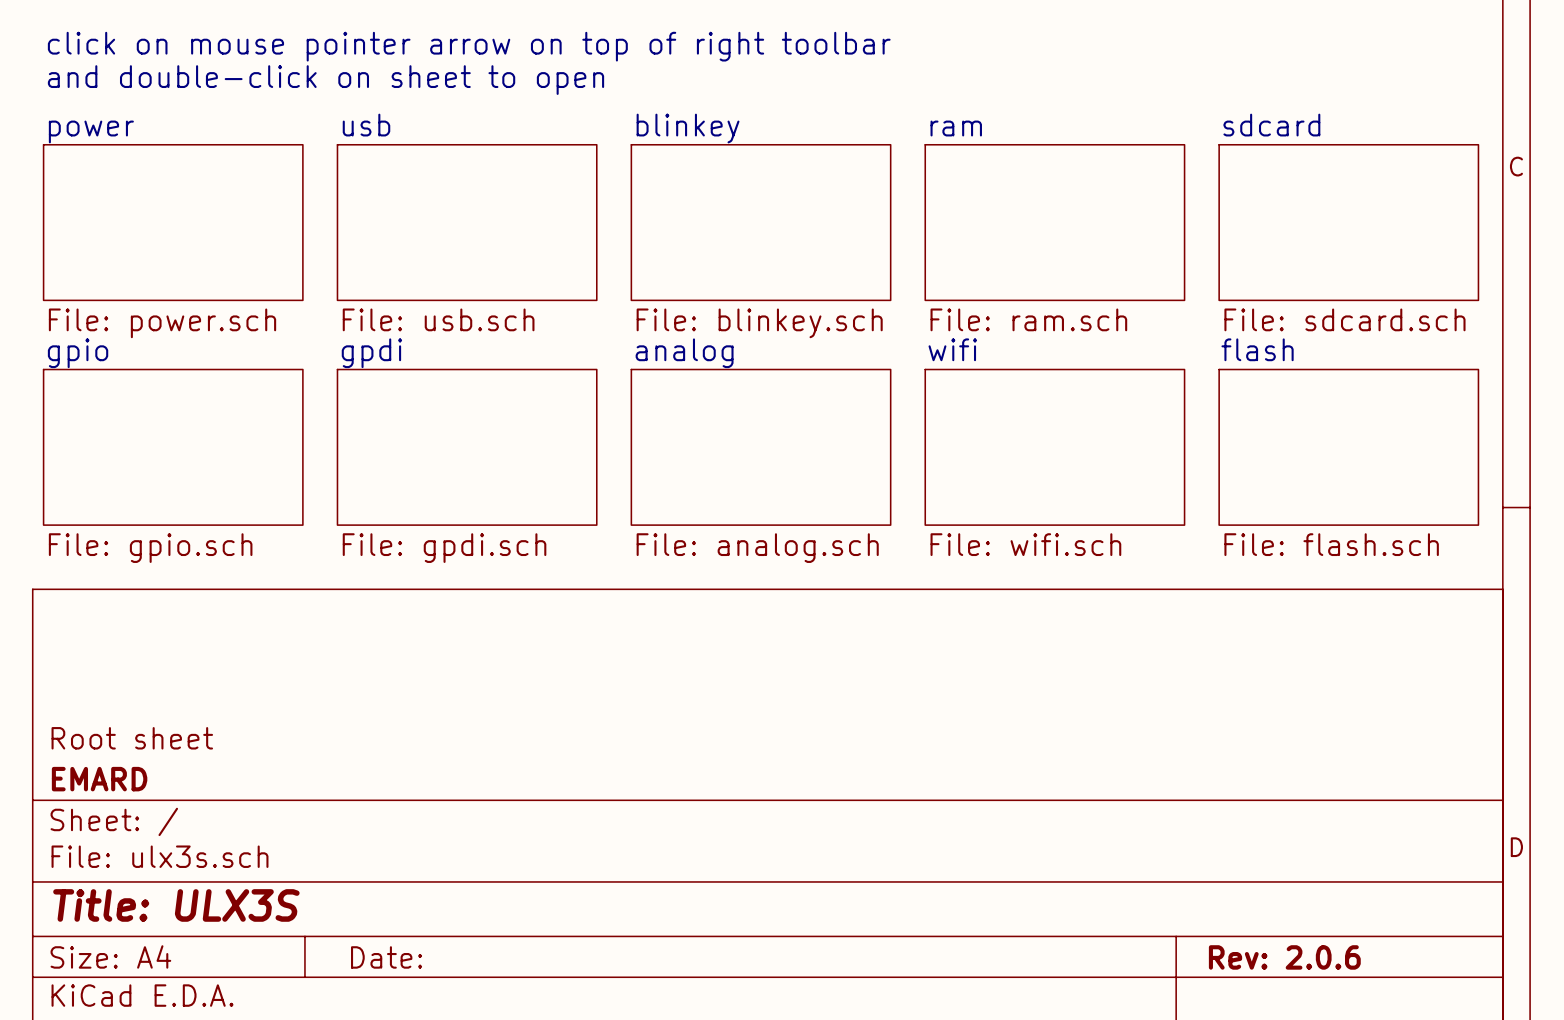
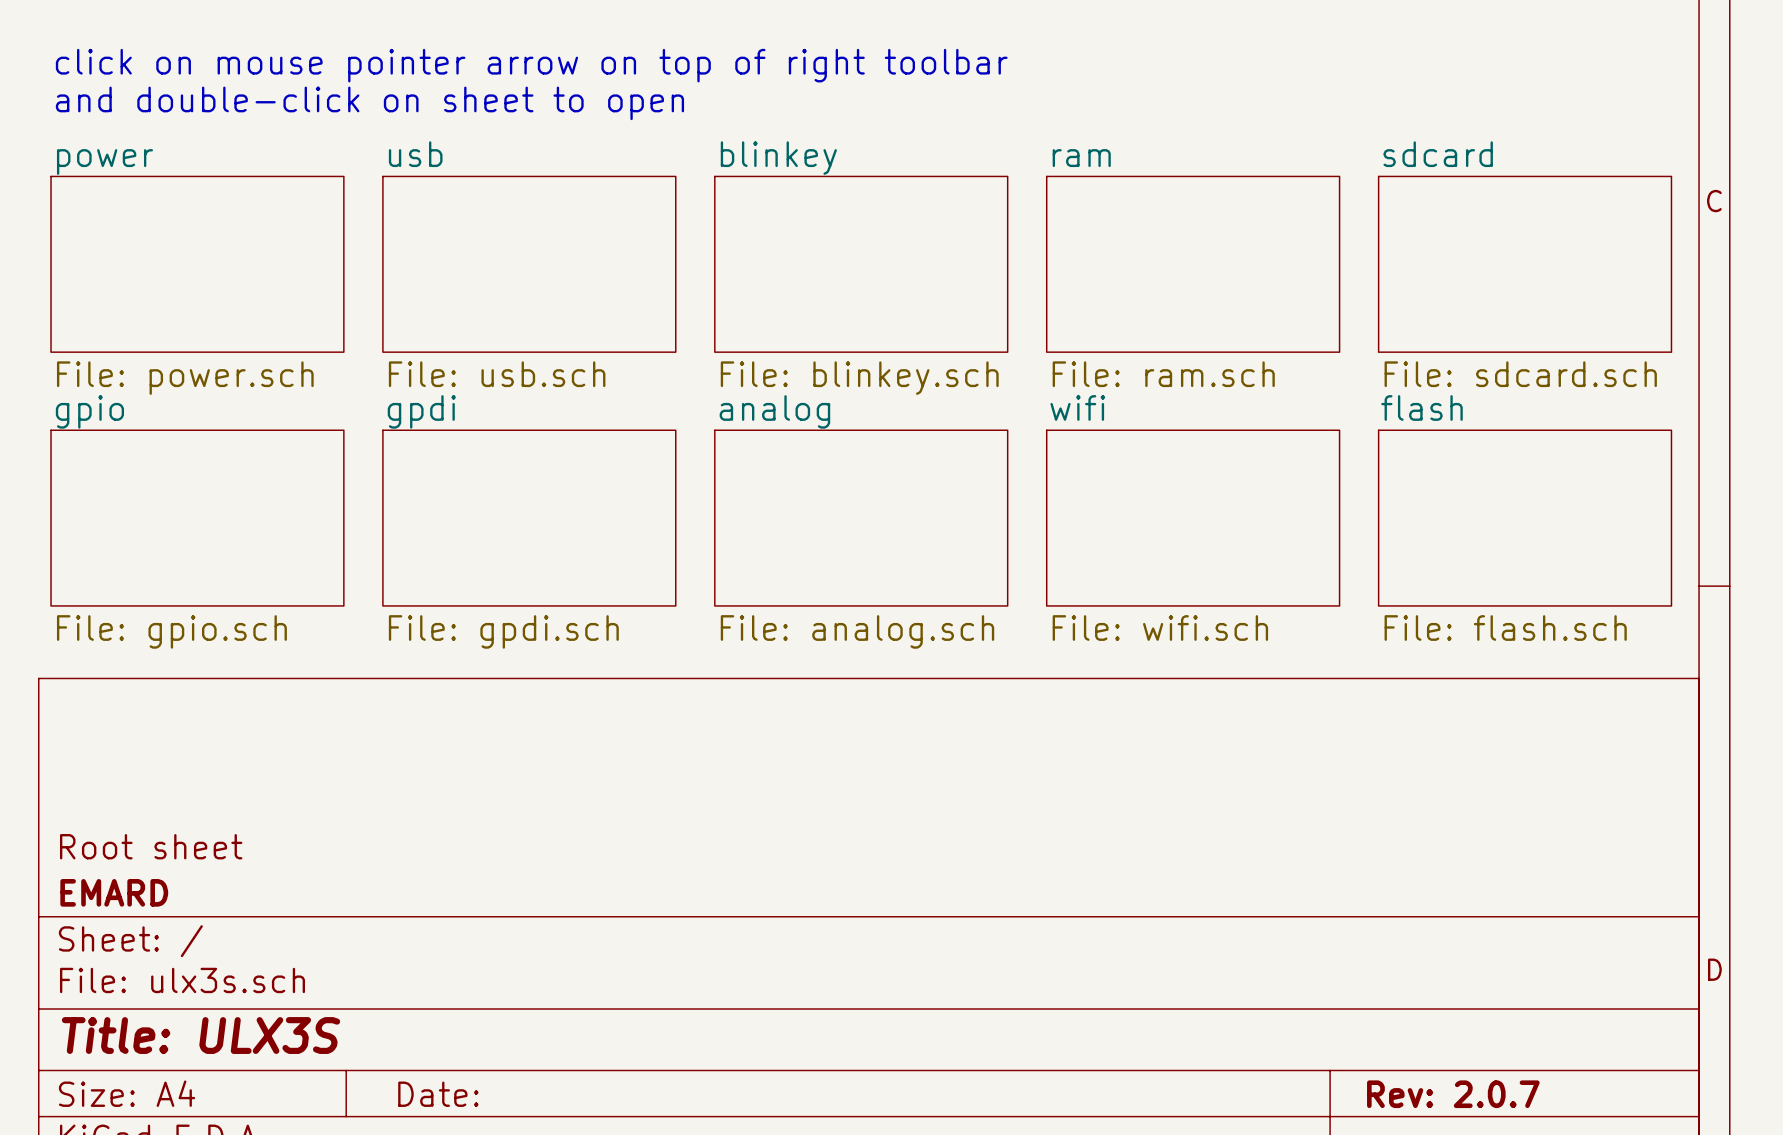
title block: Rev: 2.0.6 (1284, 957) -> Rev: 2.0.7 (1453, 1094)

